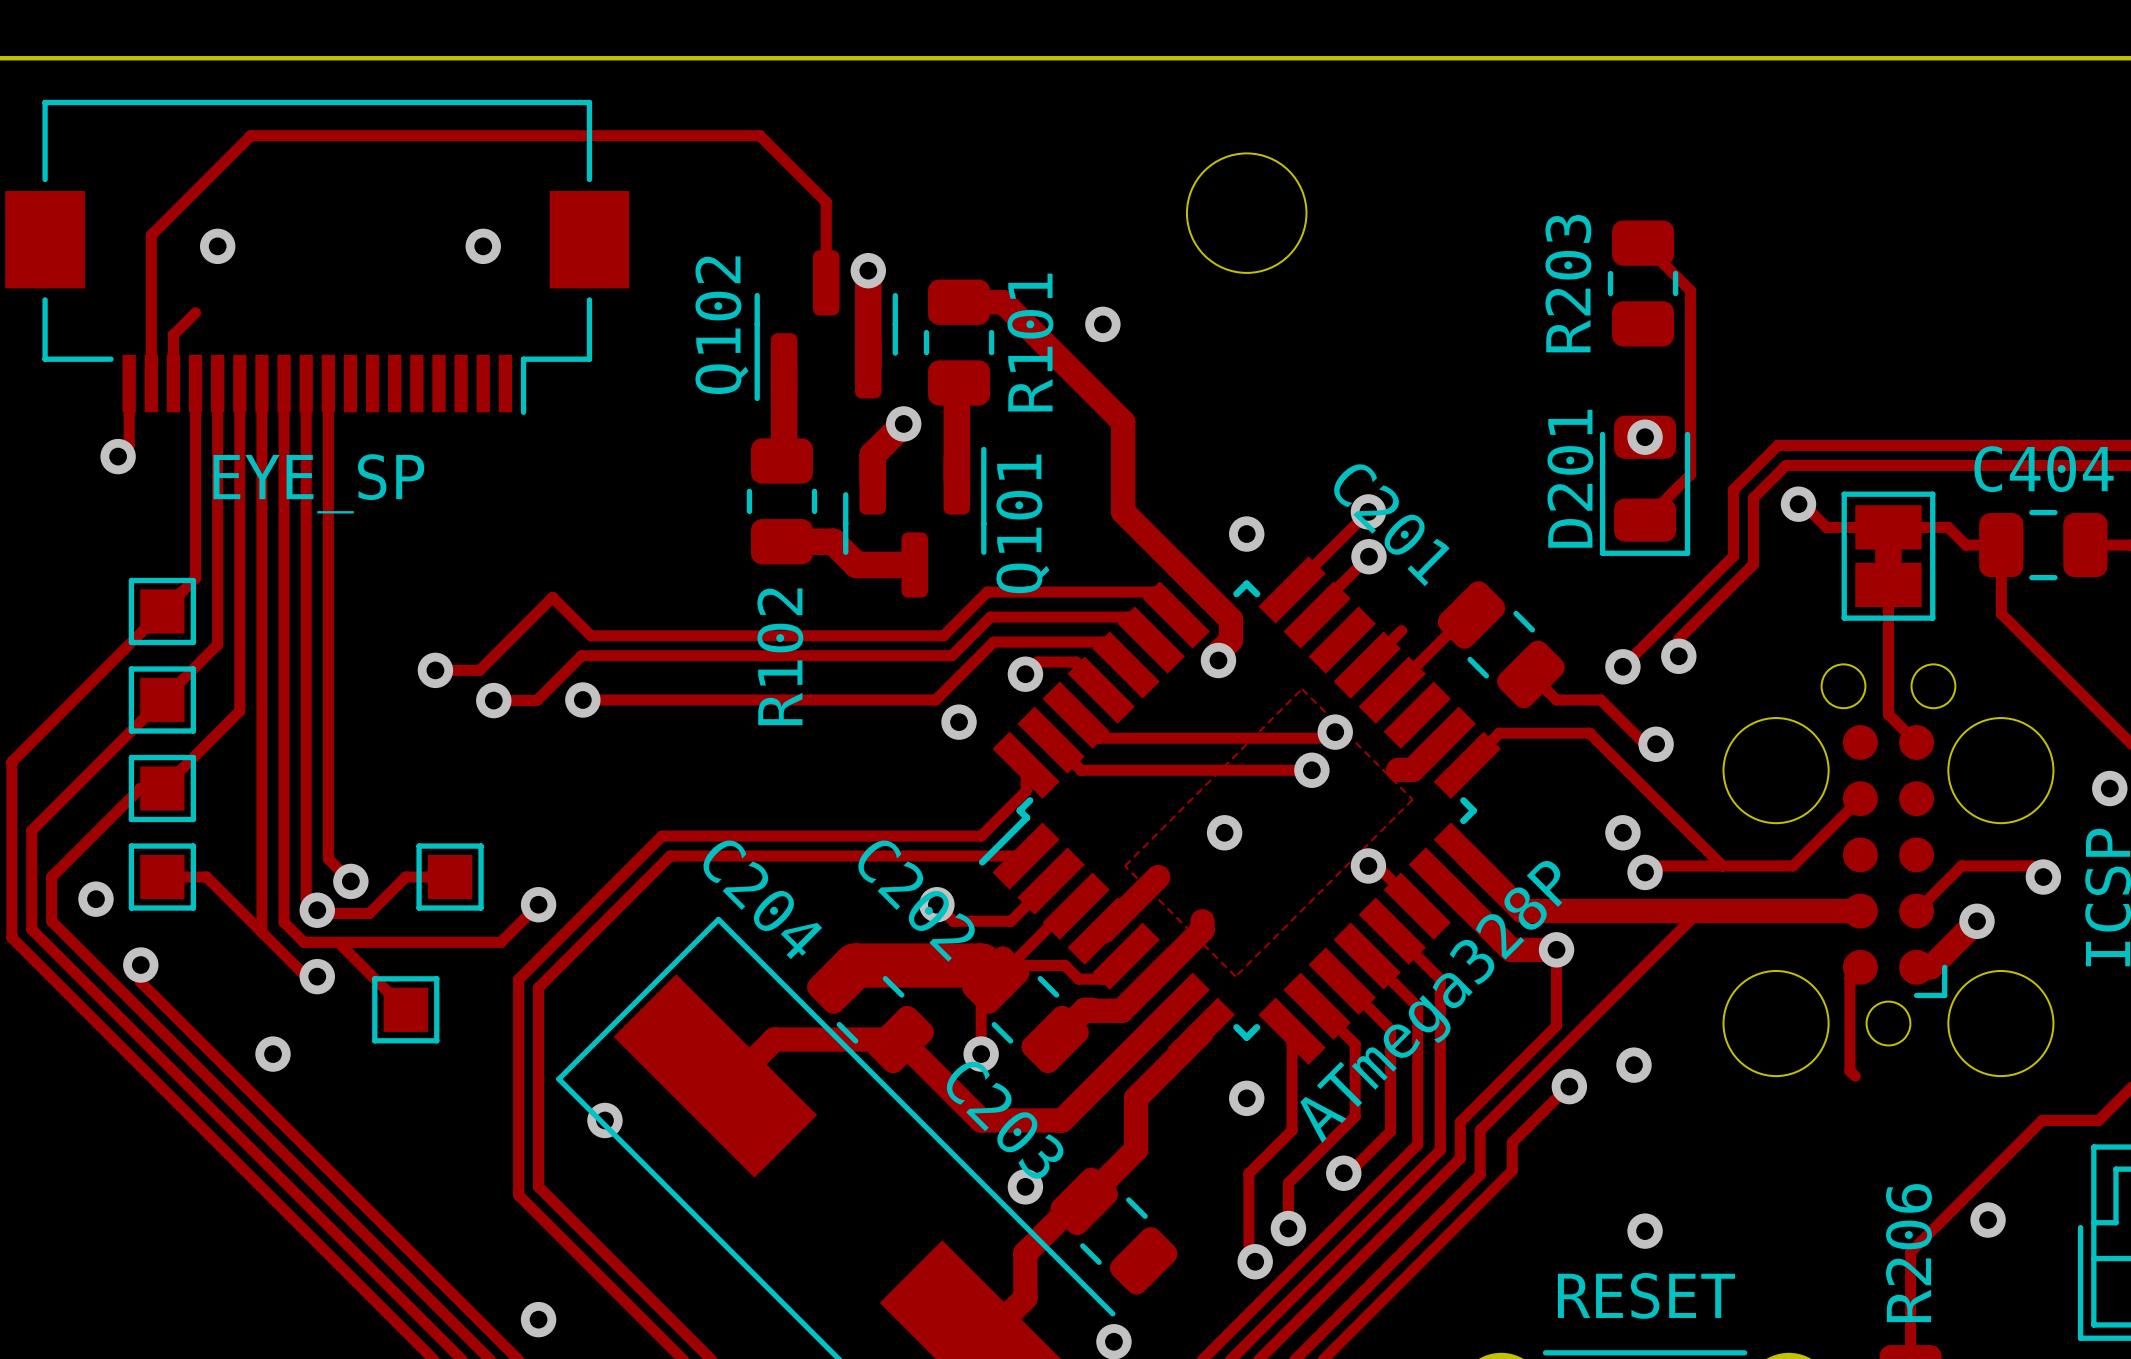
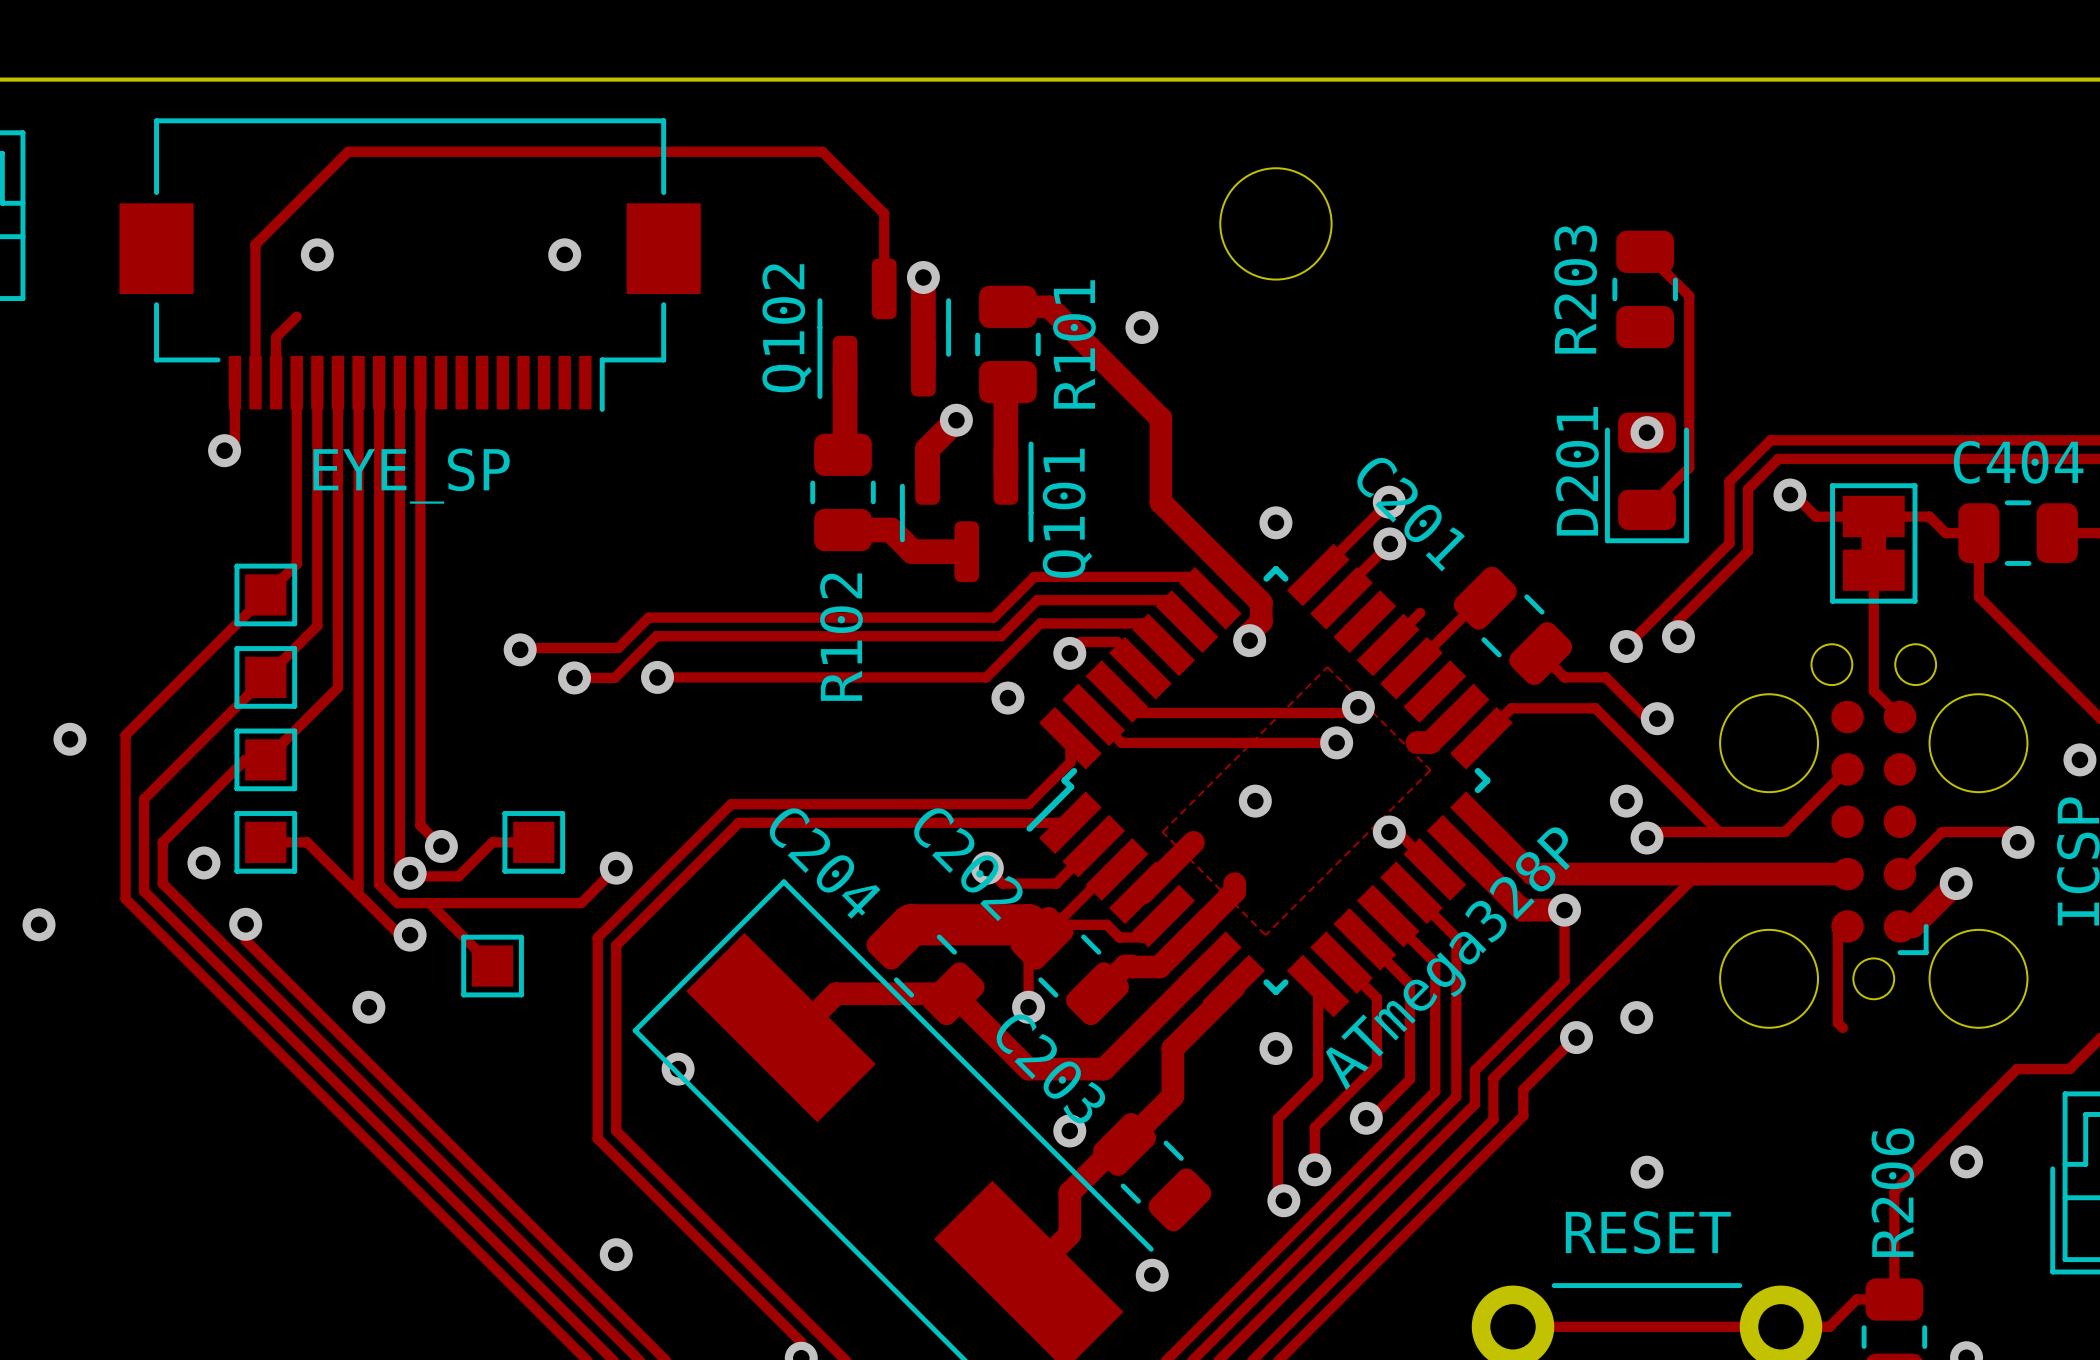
track: (591, 635) (552, 597) (479, 670) (435, 670) -> (665, 617) (648, 617) (618, 648) (521, 648) (520, 649)

